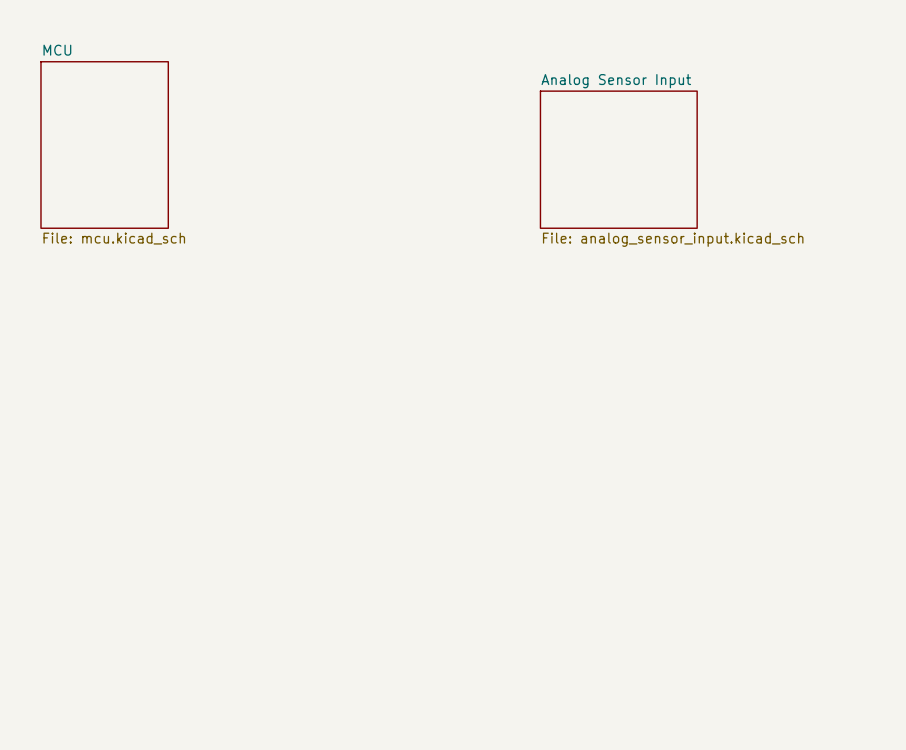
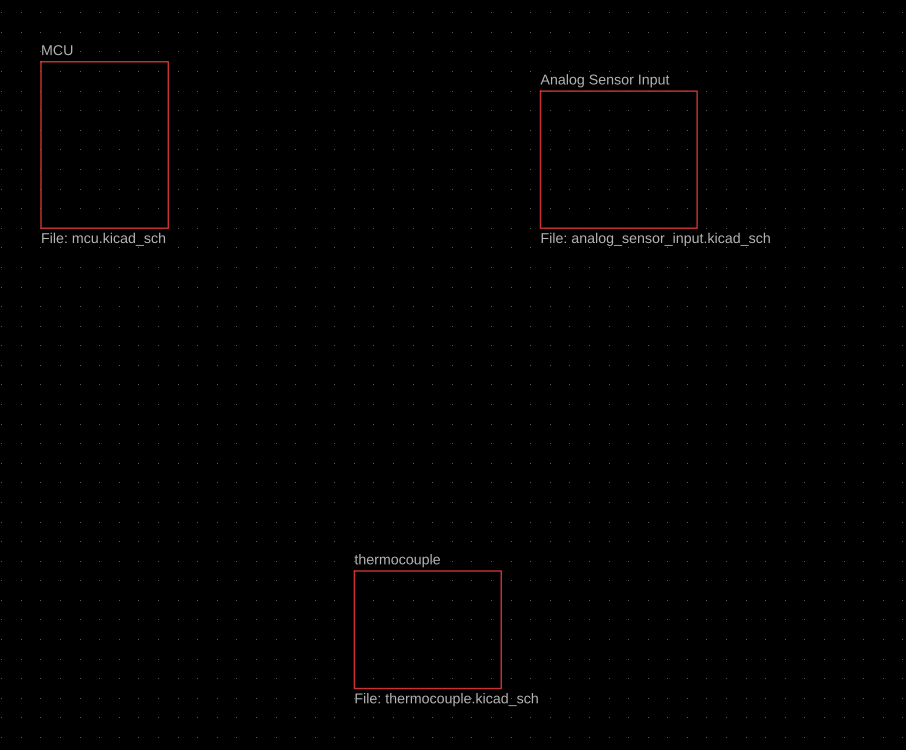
sheet thermocouple: none -> File: thermocouple.kicad_sch (427, 629)

